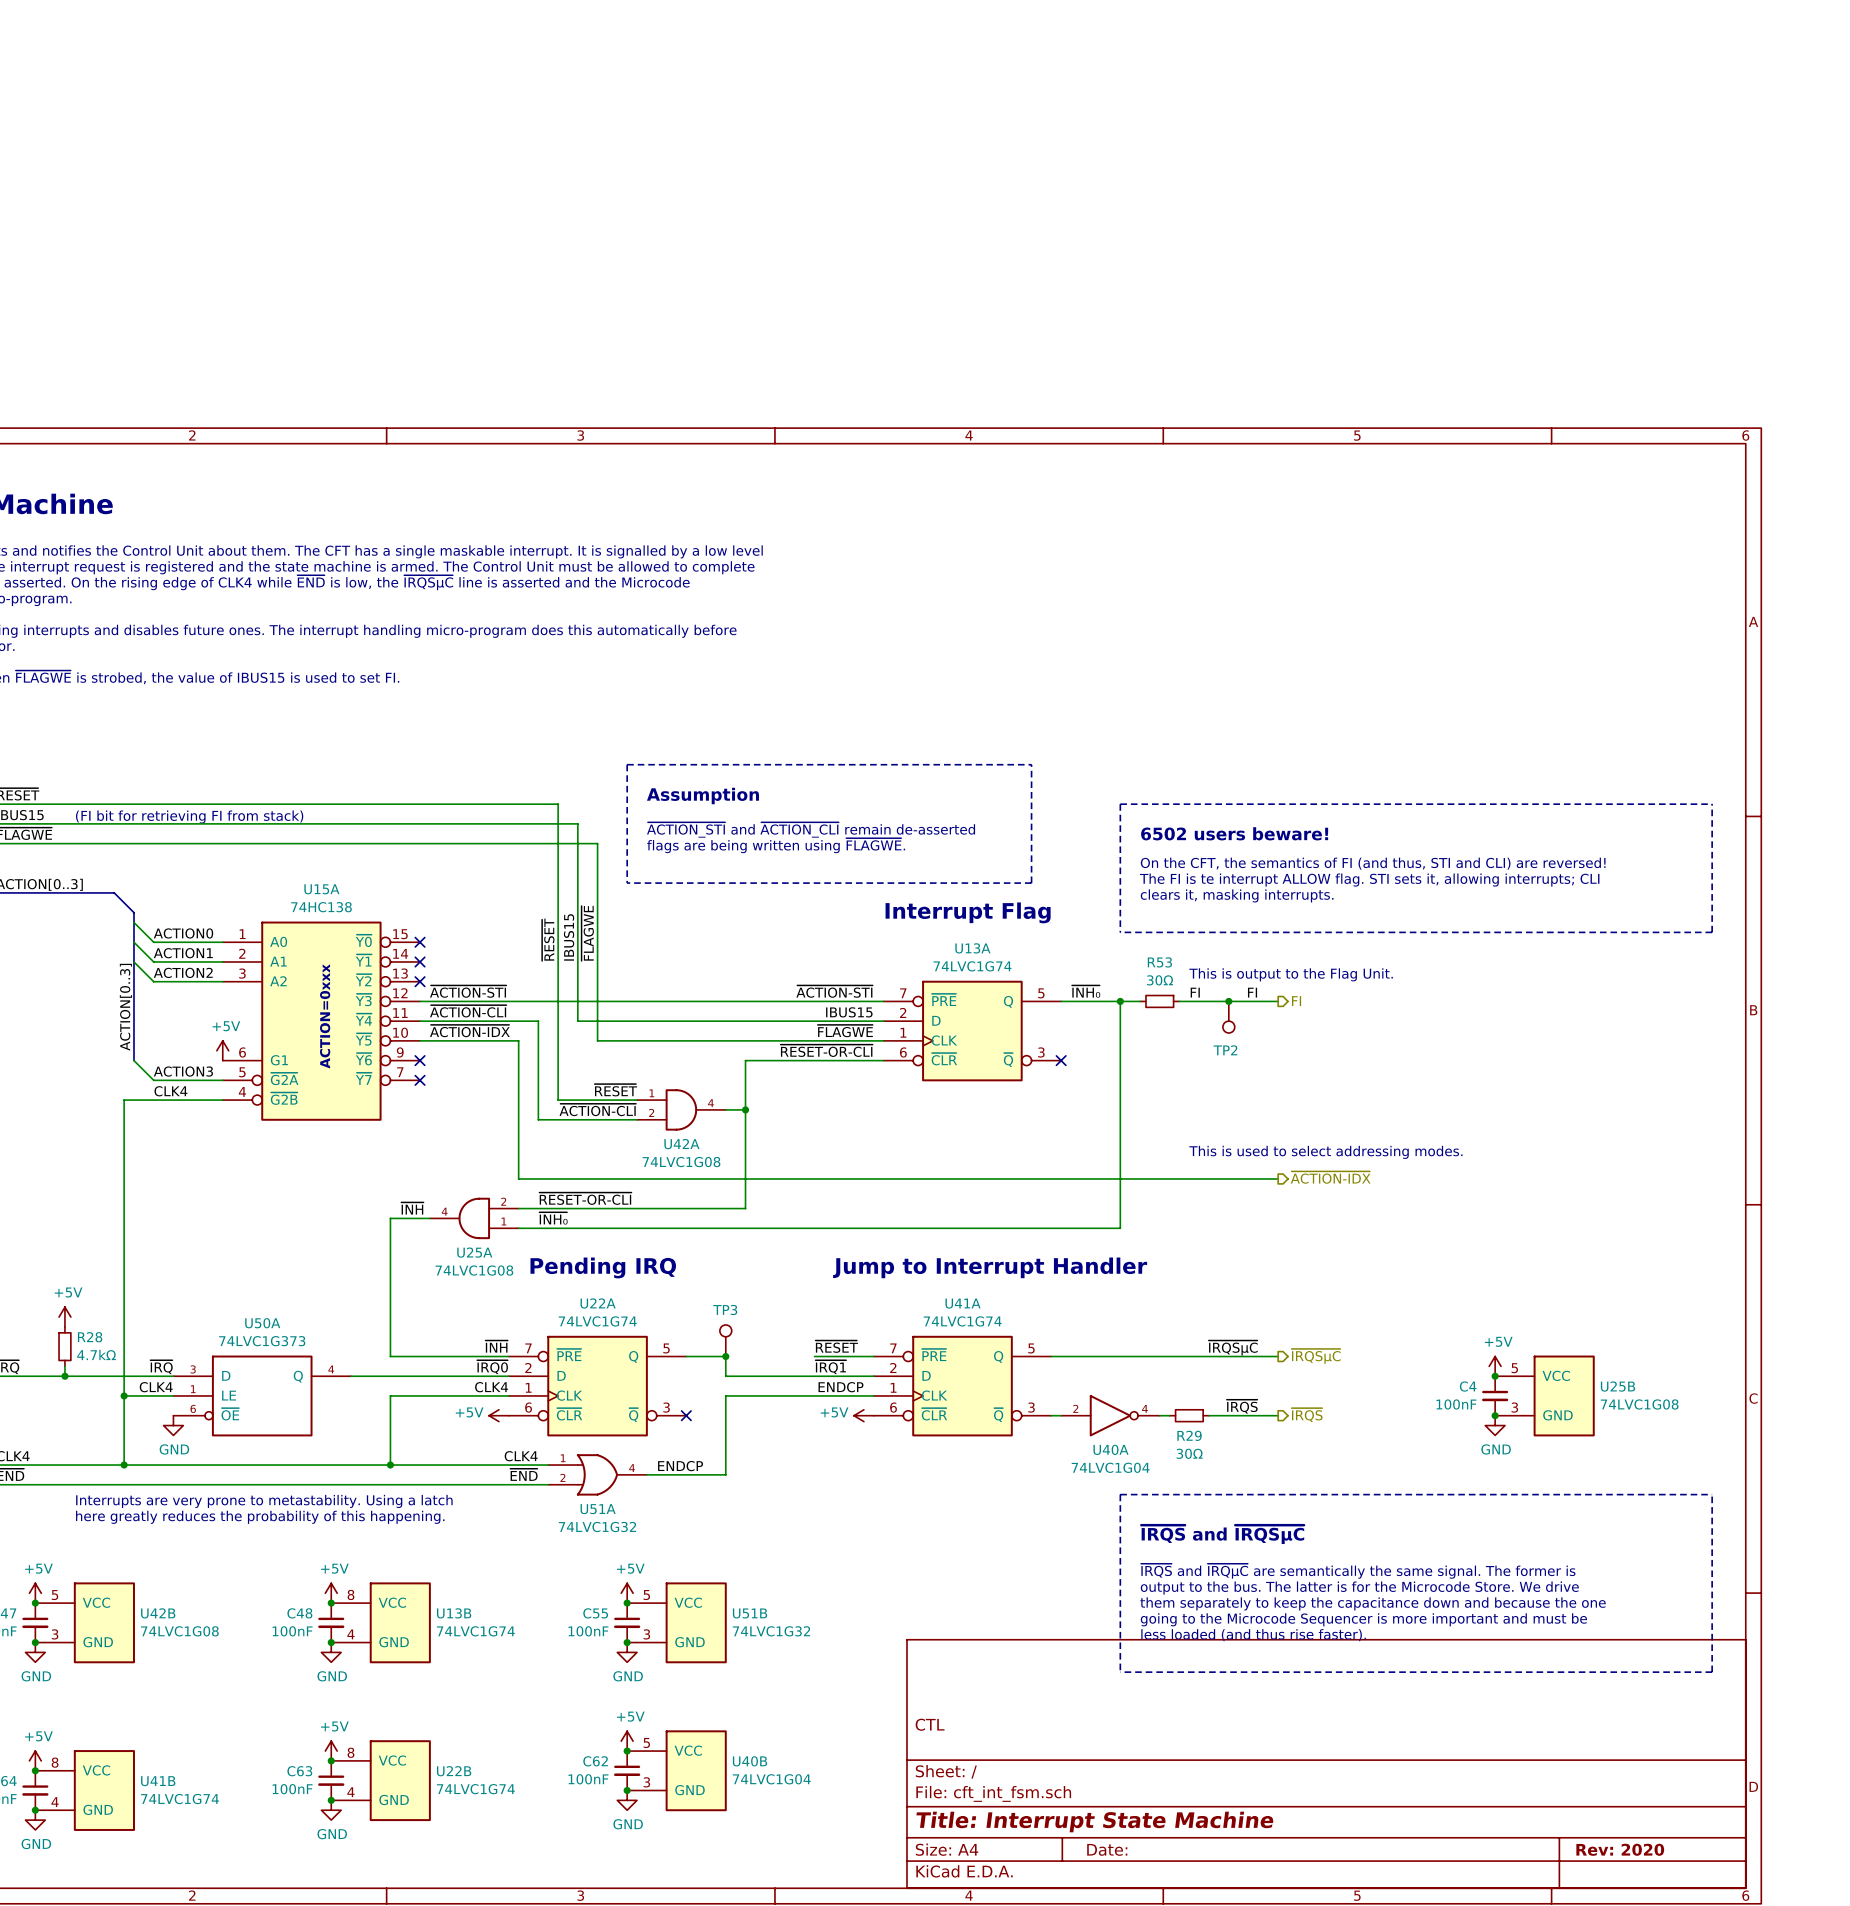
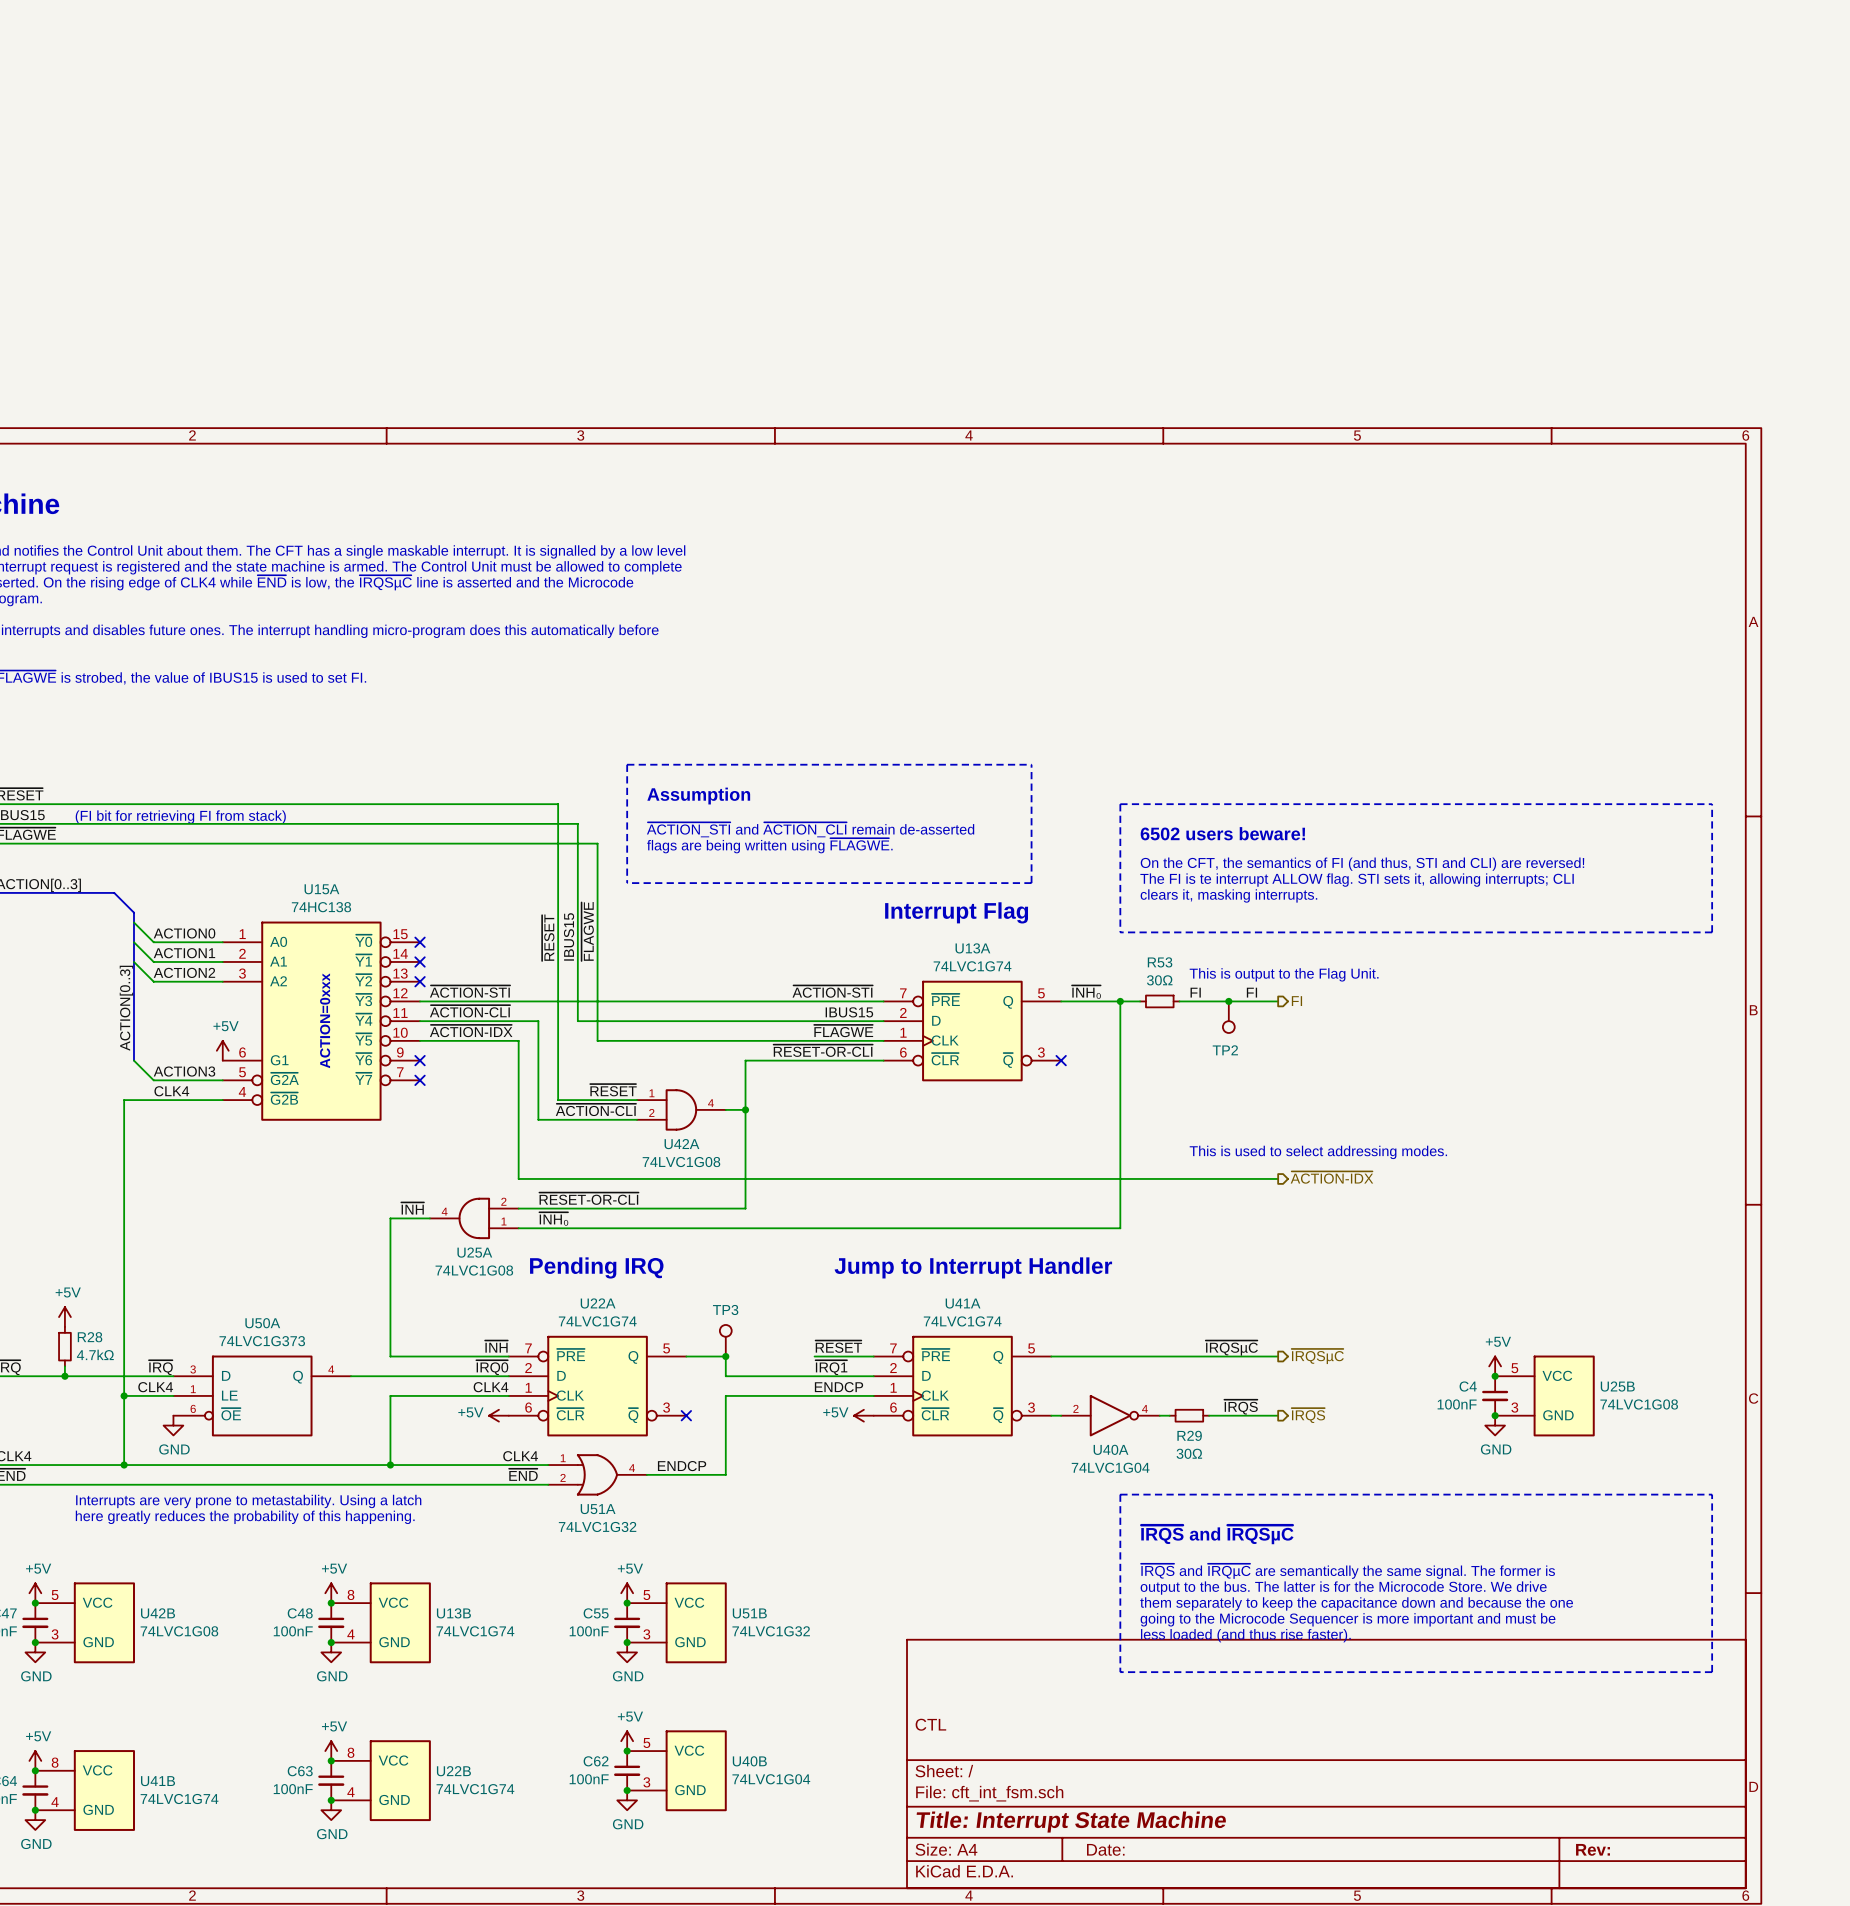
title block: Rev: 2020 (1620, 1849) -> Rev: (1593, 1849)

